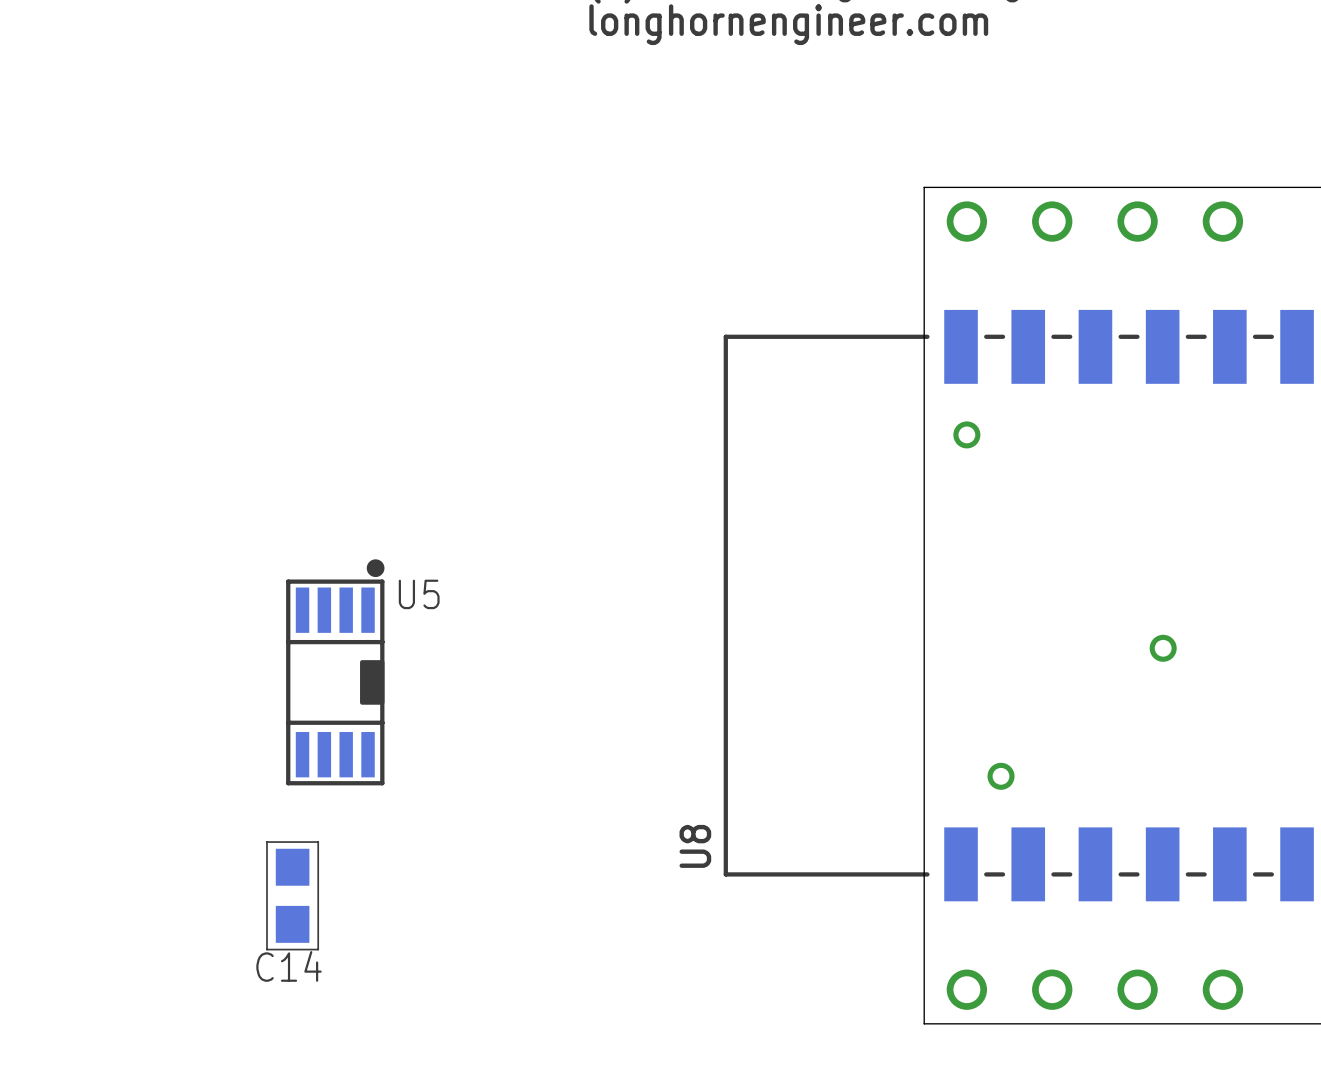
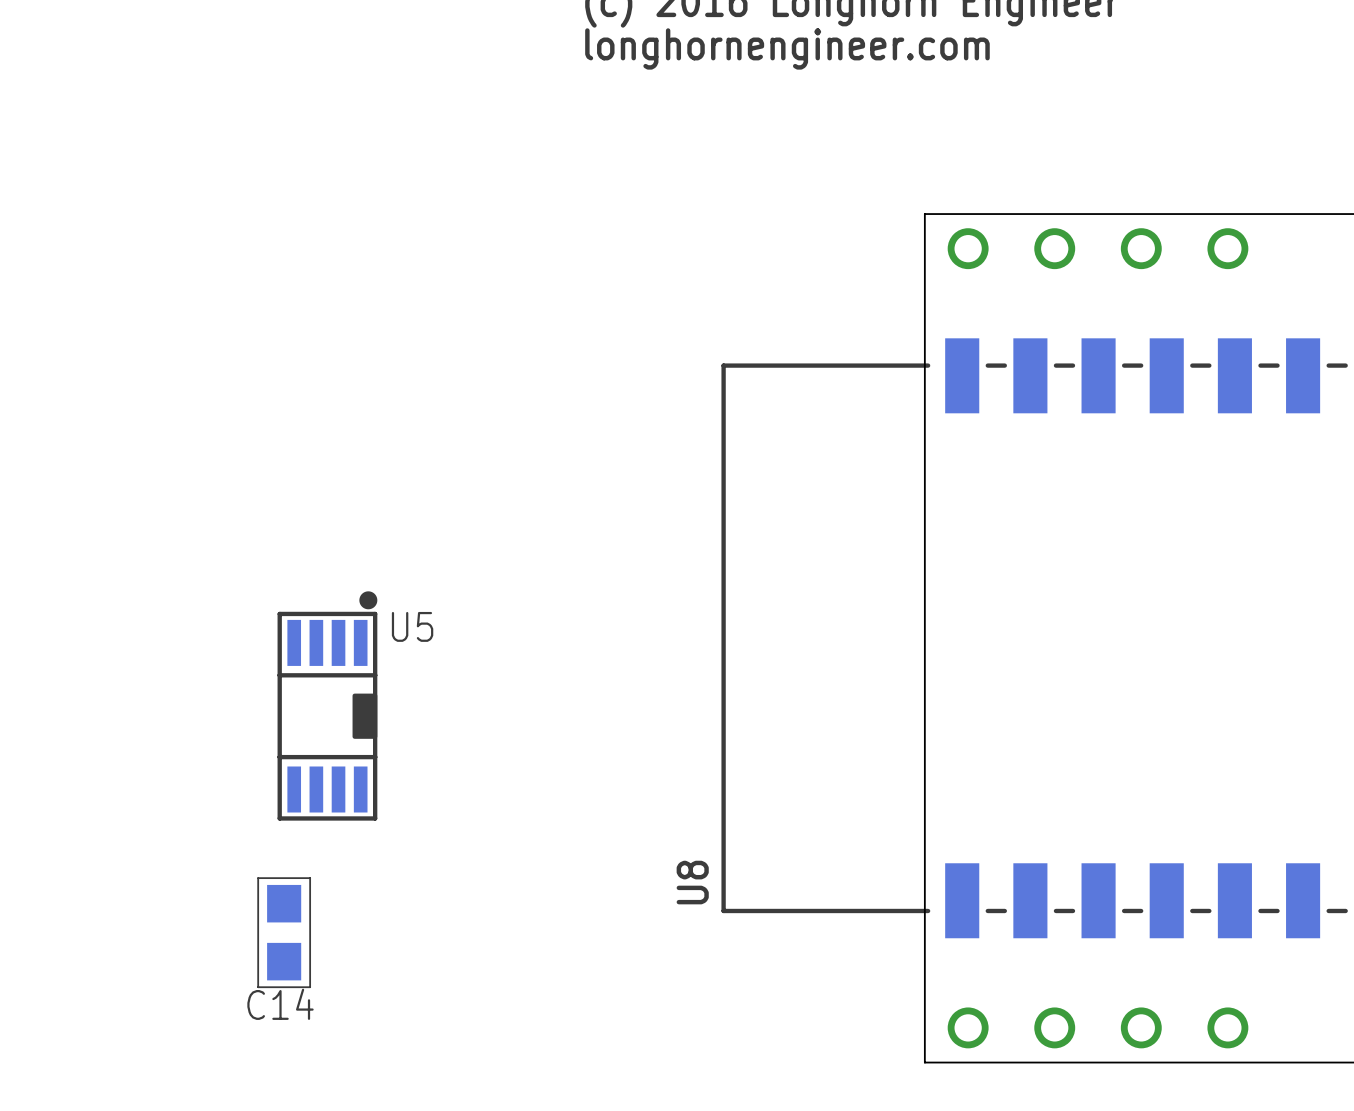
via: (966, 434) -> none
via: (1163, 648) -> none
via: (1001, 776) -> none

